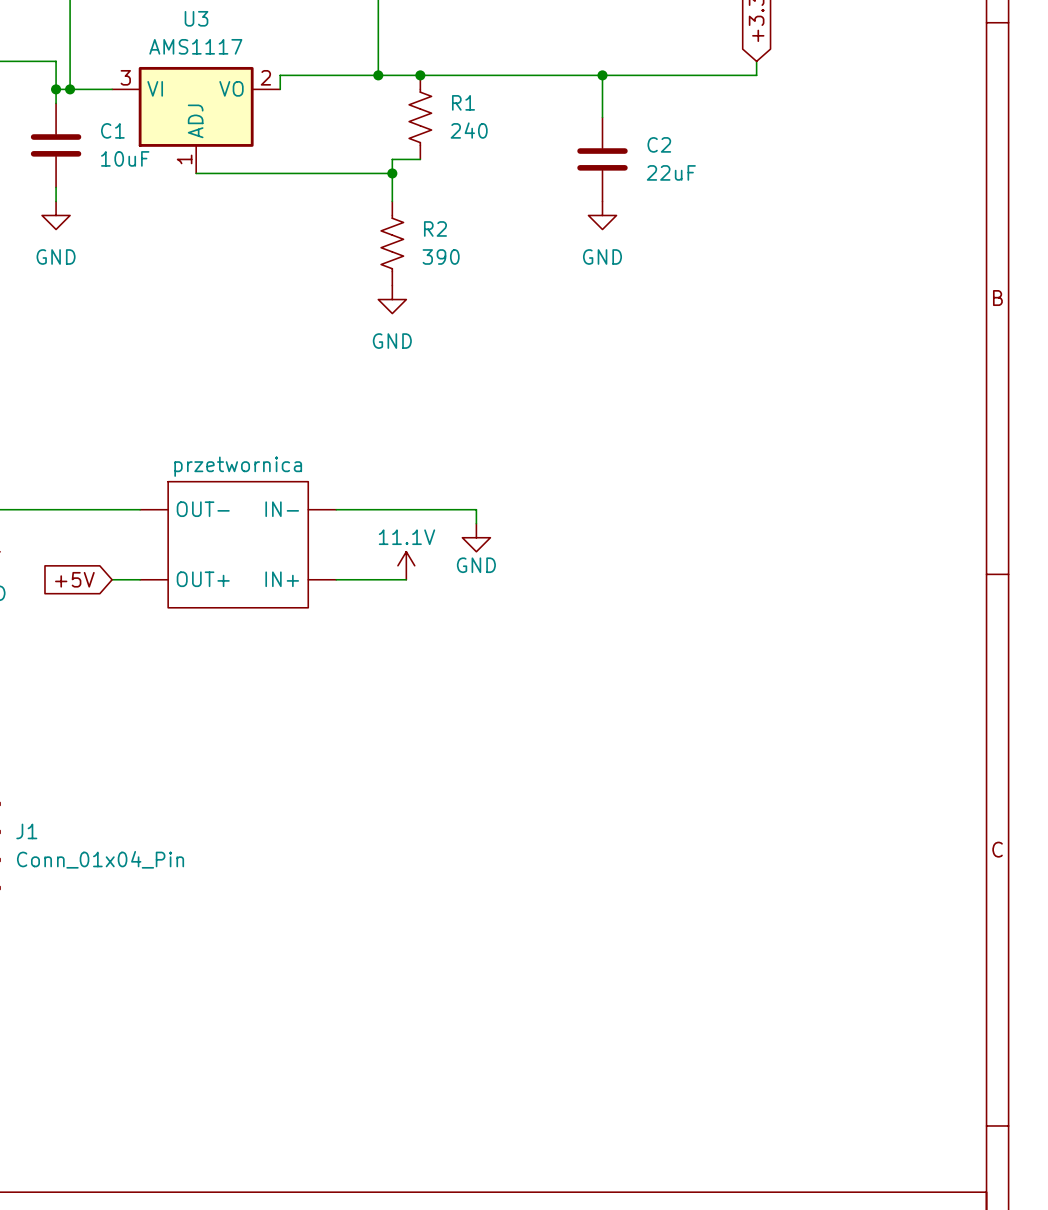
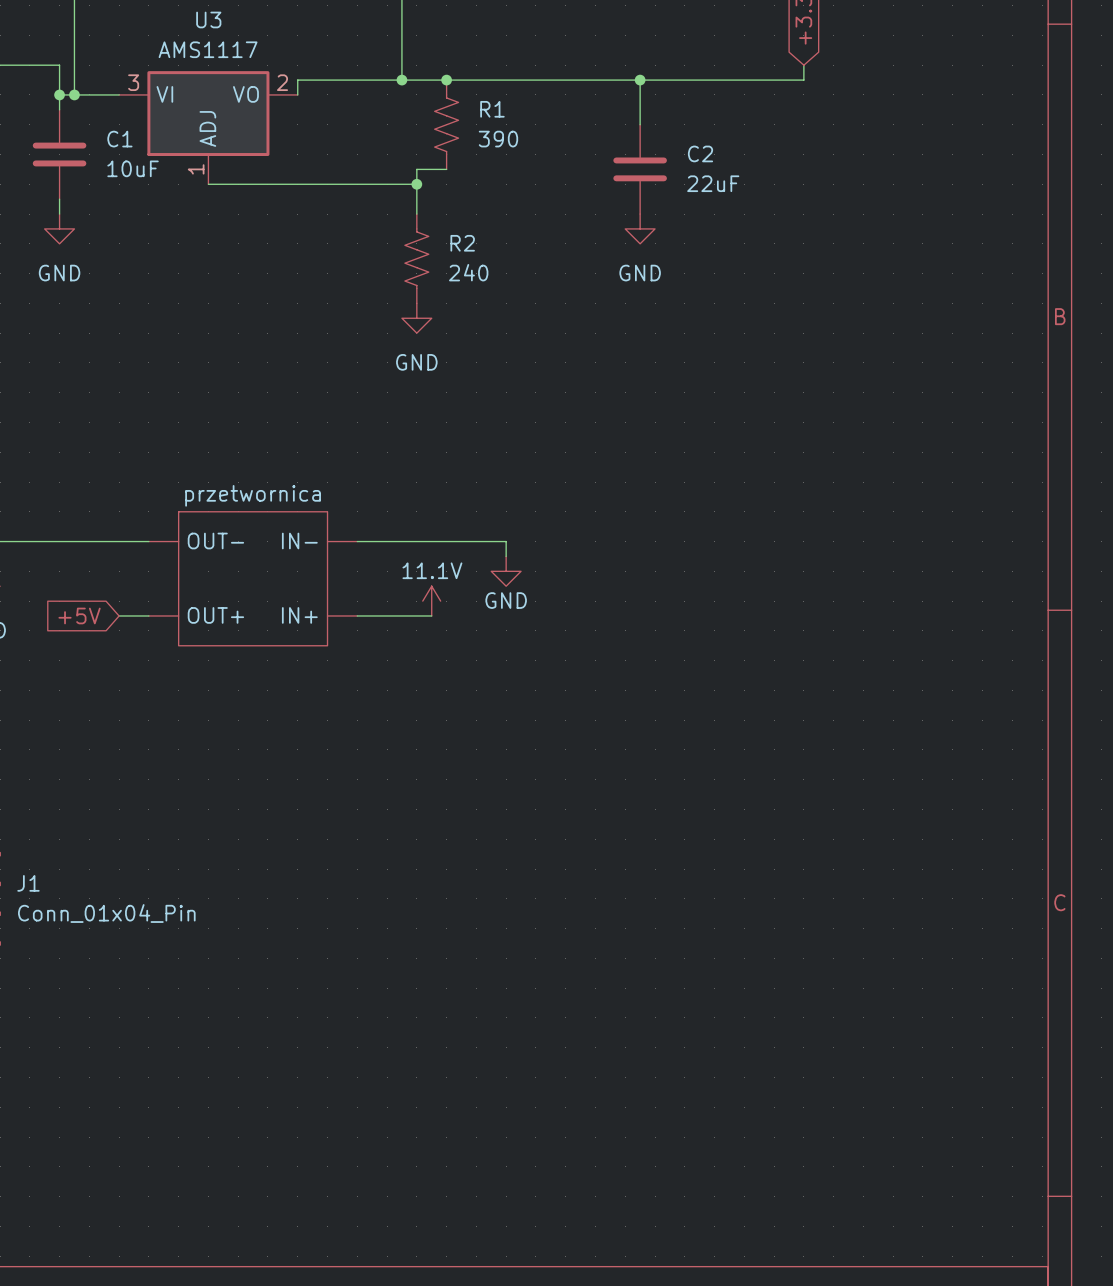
R1 value: 240 (469, 130) -> 390 (498, 139)
R2 value: 390 (441, 256) -> 240 (468, 272)

